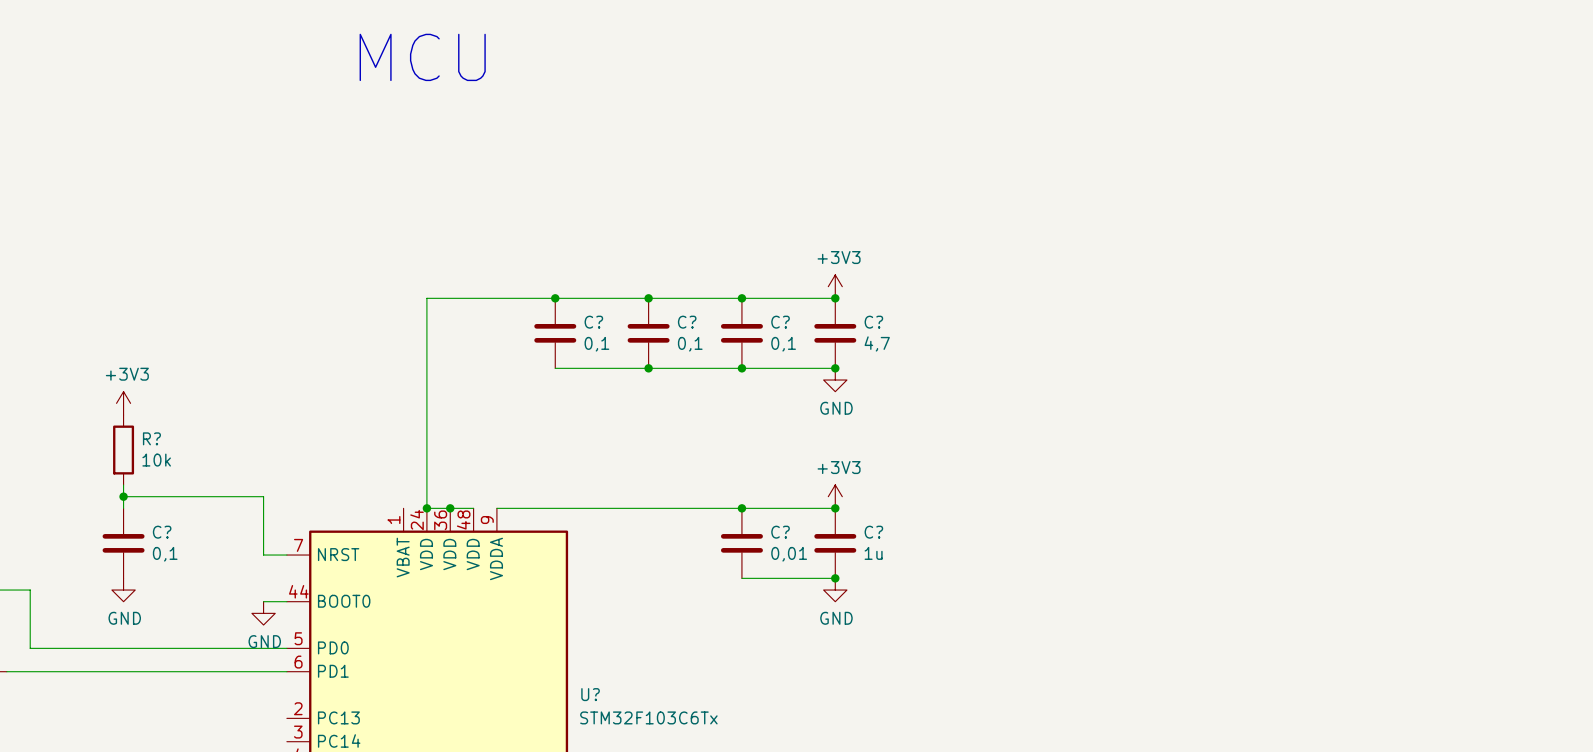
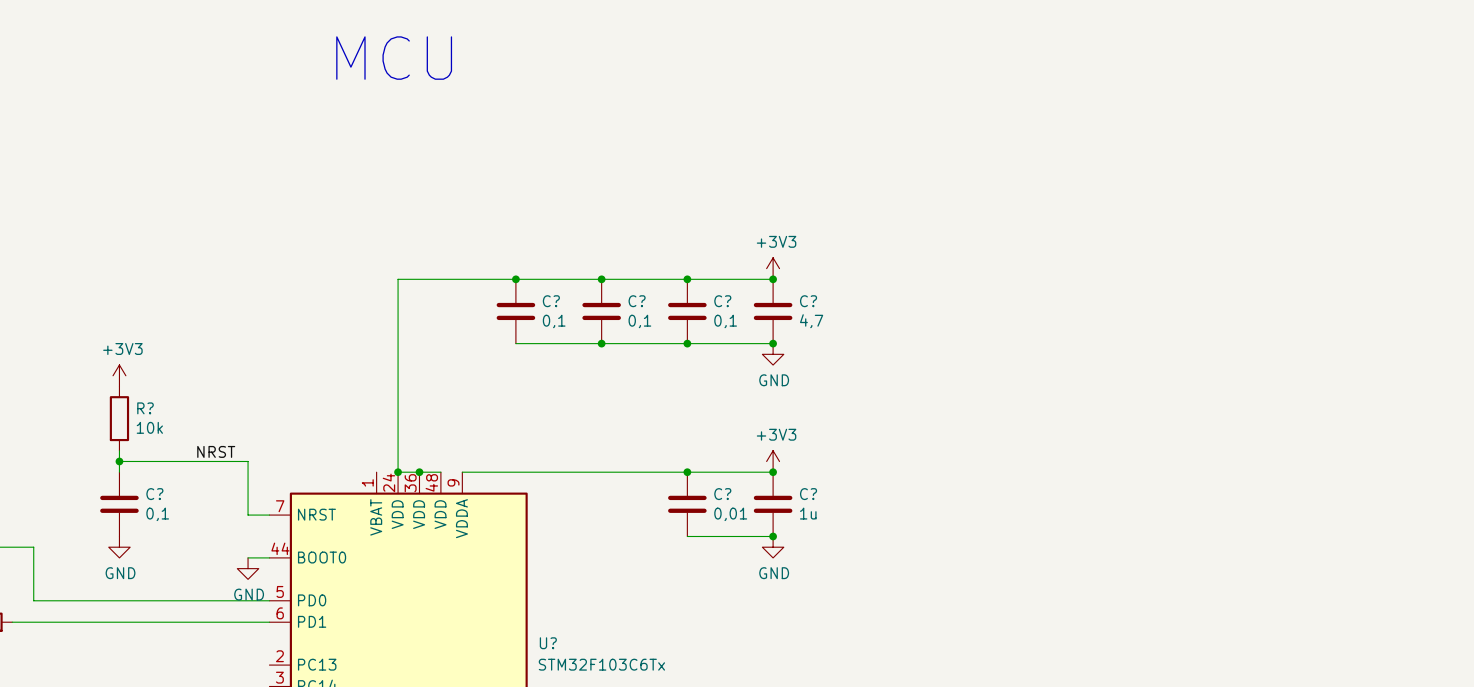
label: none -> NRST (216, 451)

